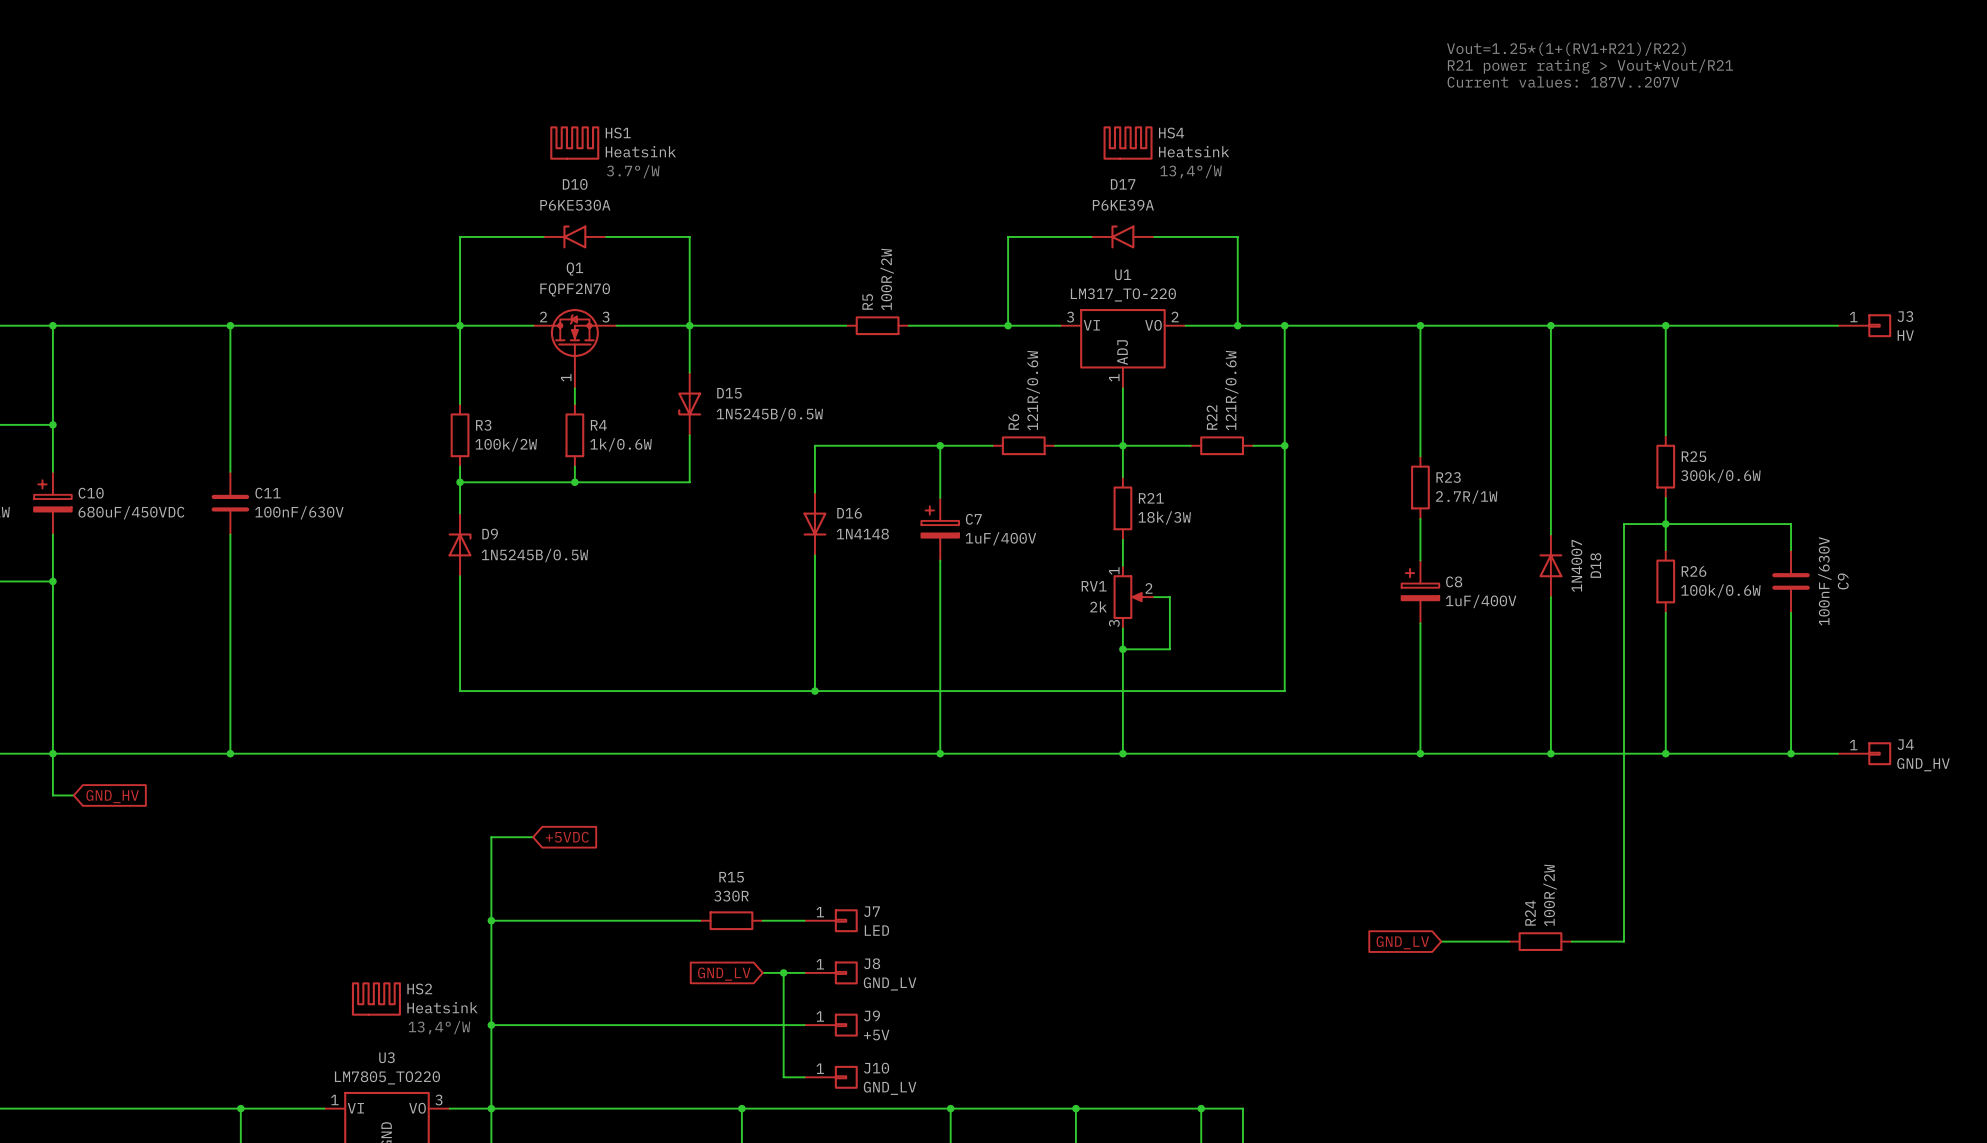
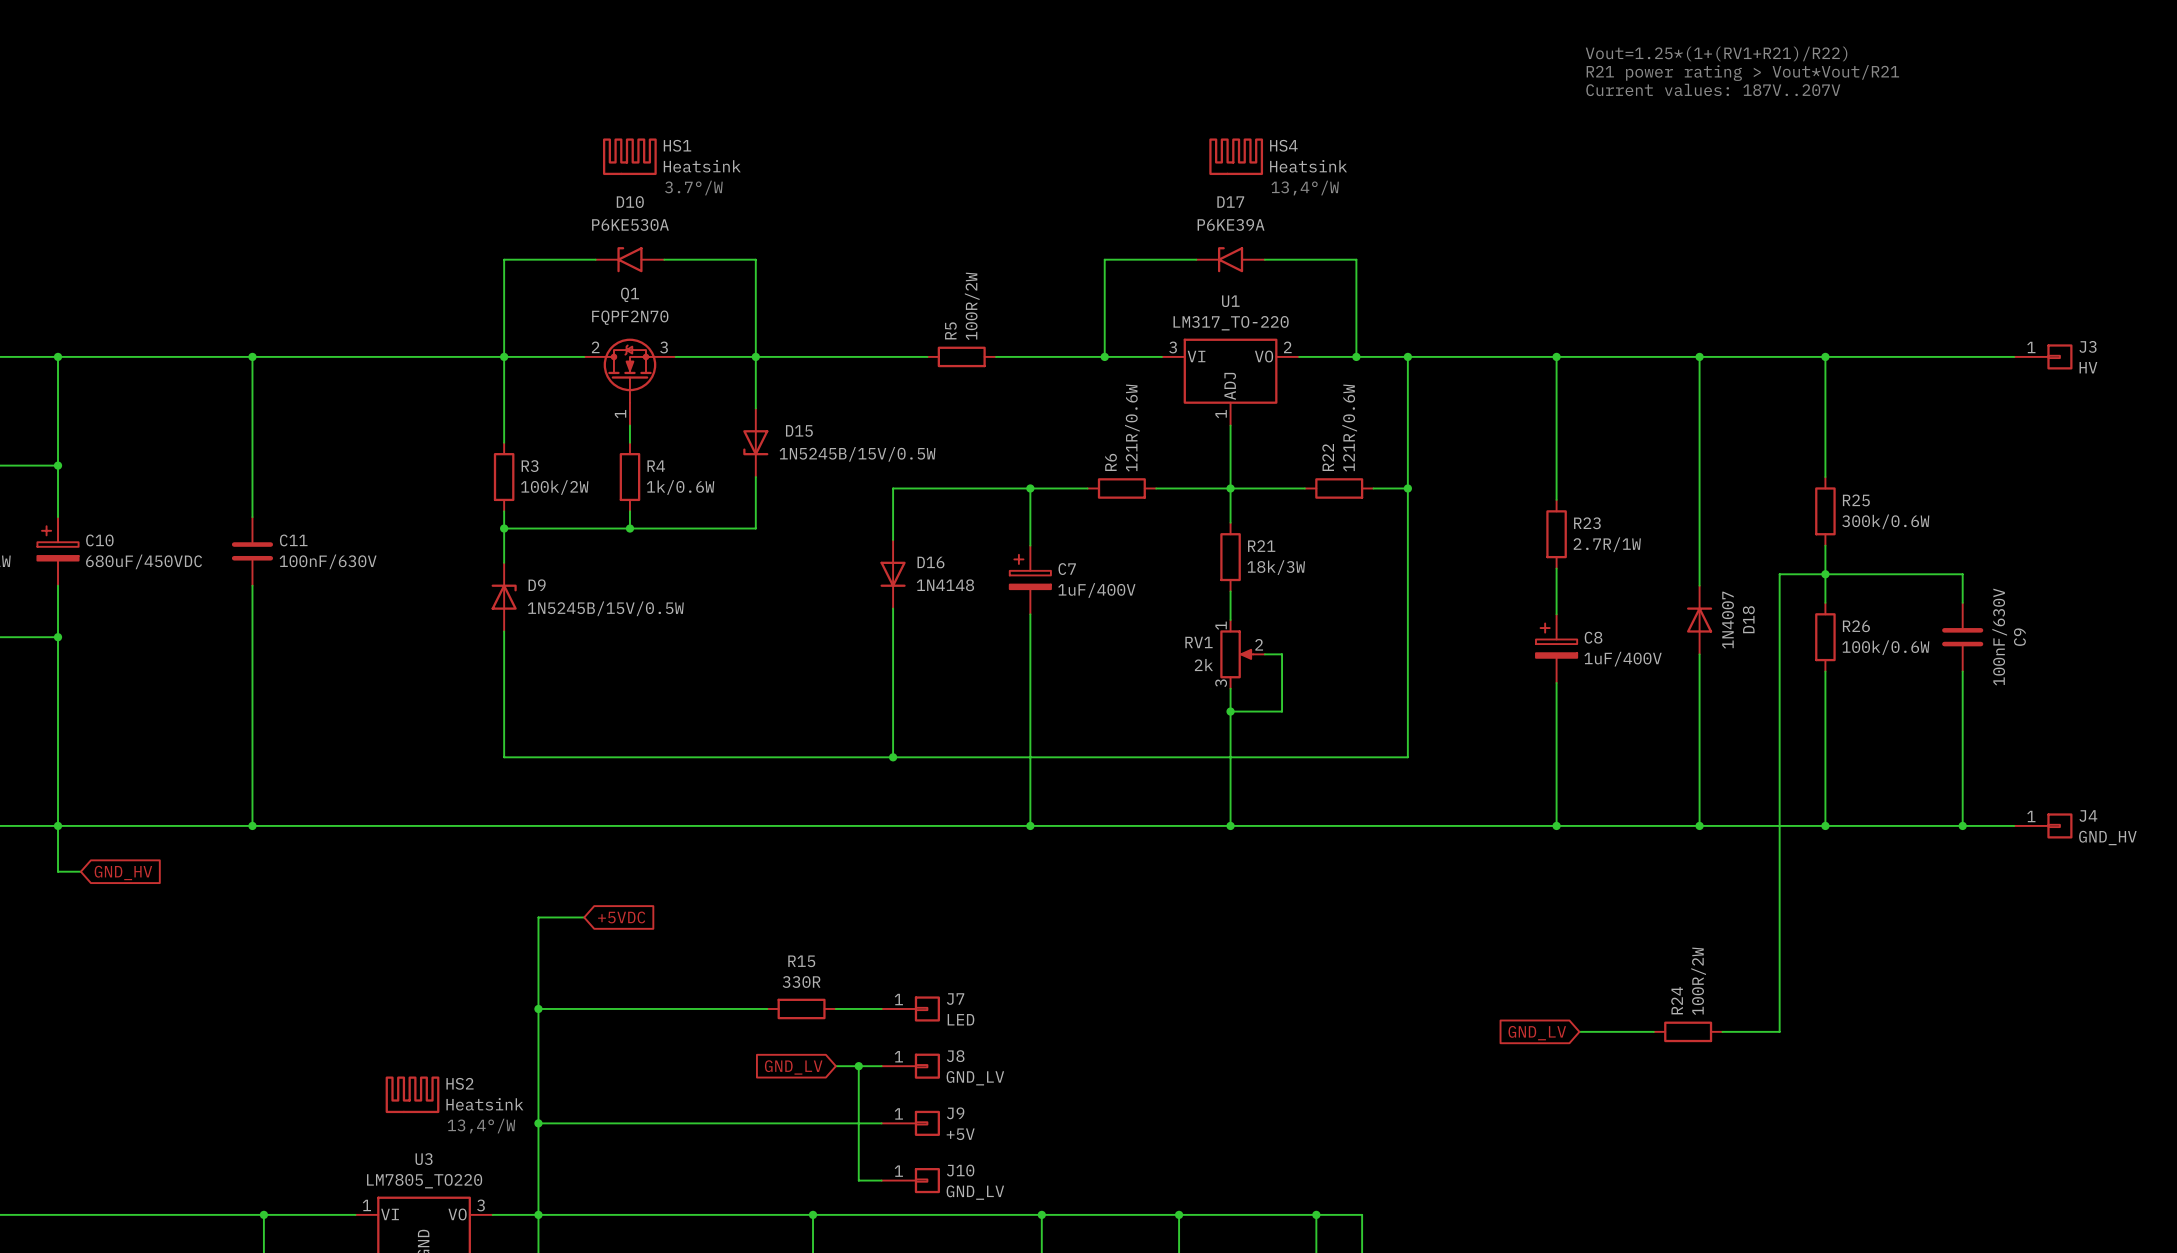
D15 value: 1N5245B/0.5W (769, 414) -> 1N5245B/15V/0.5W (857, 454)
D9 value: 1N5245B/0.5W (534, 555) -> 1N5245B/15V/0.5W (605, 608)

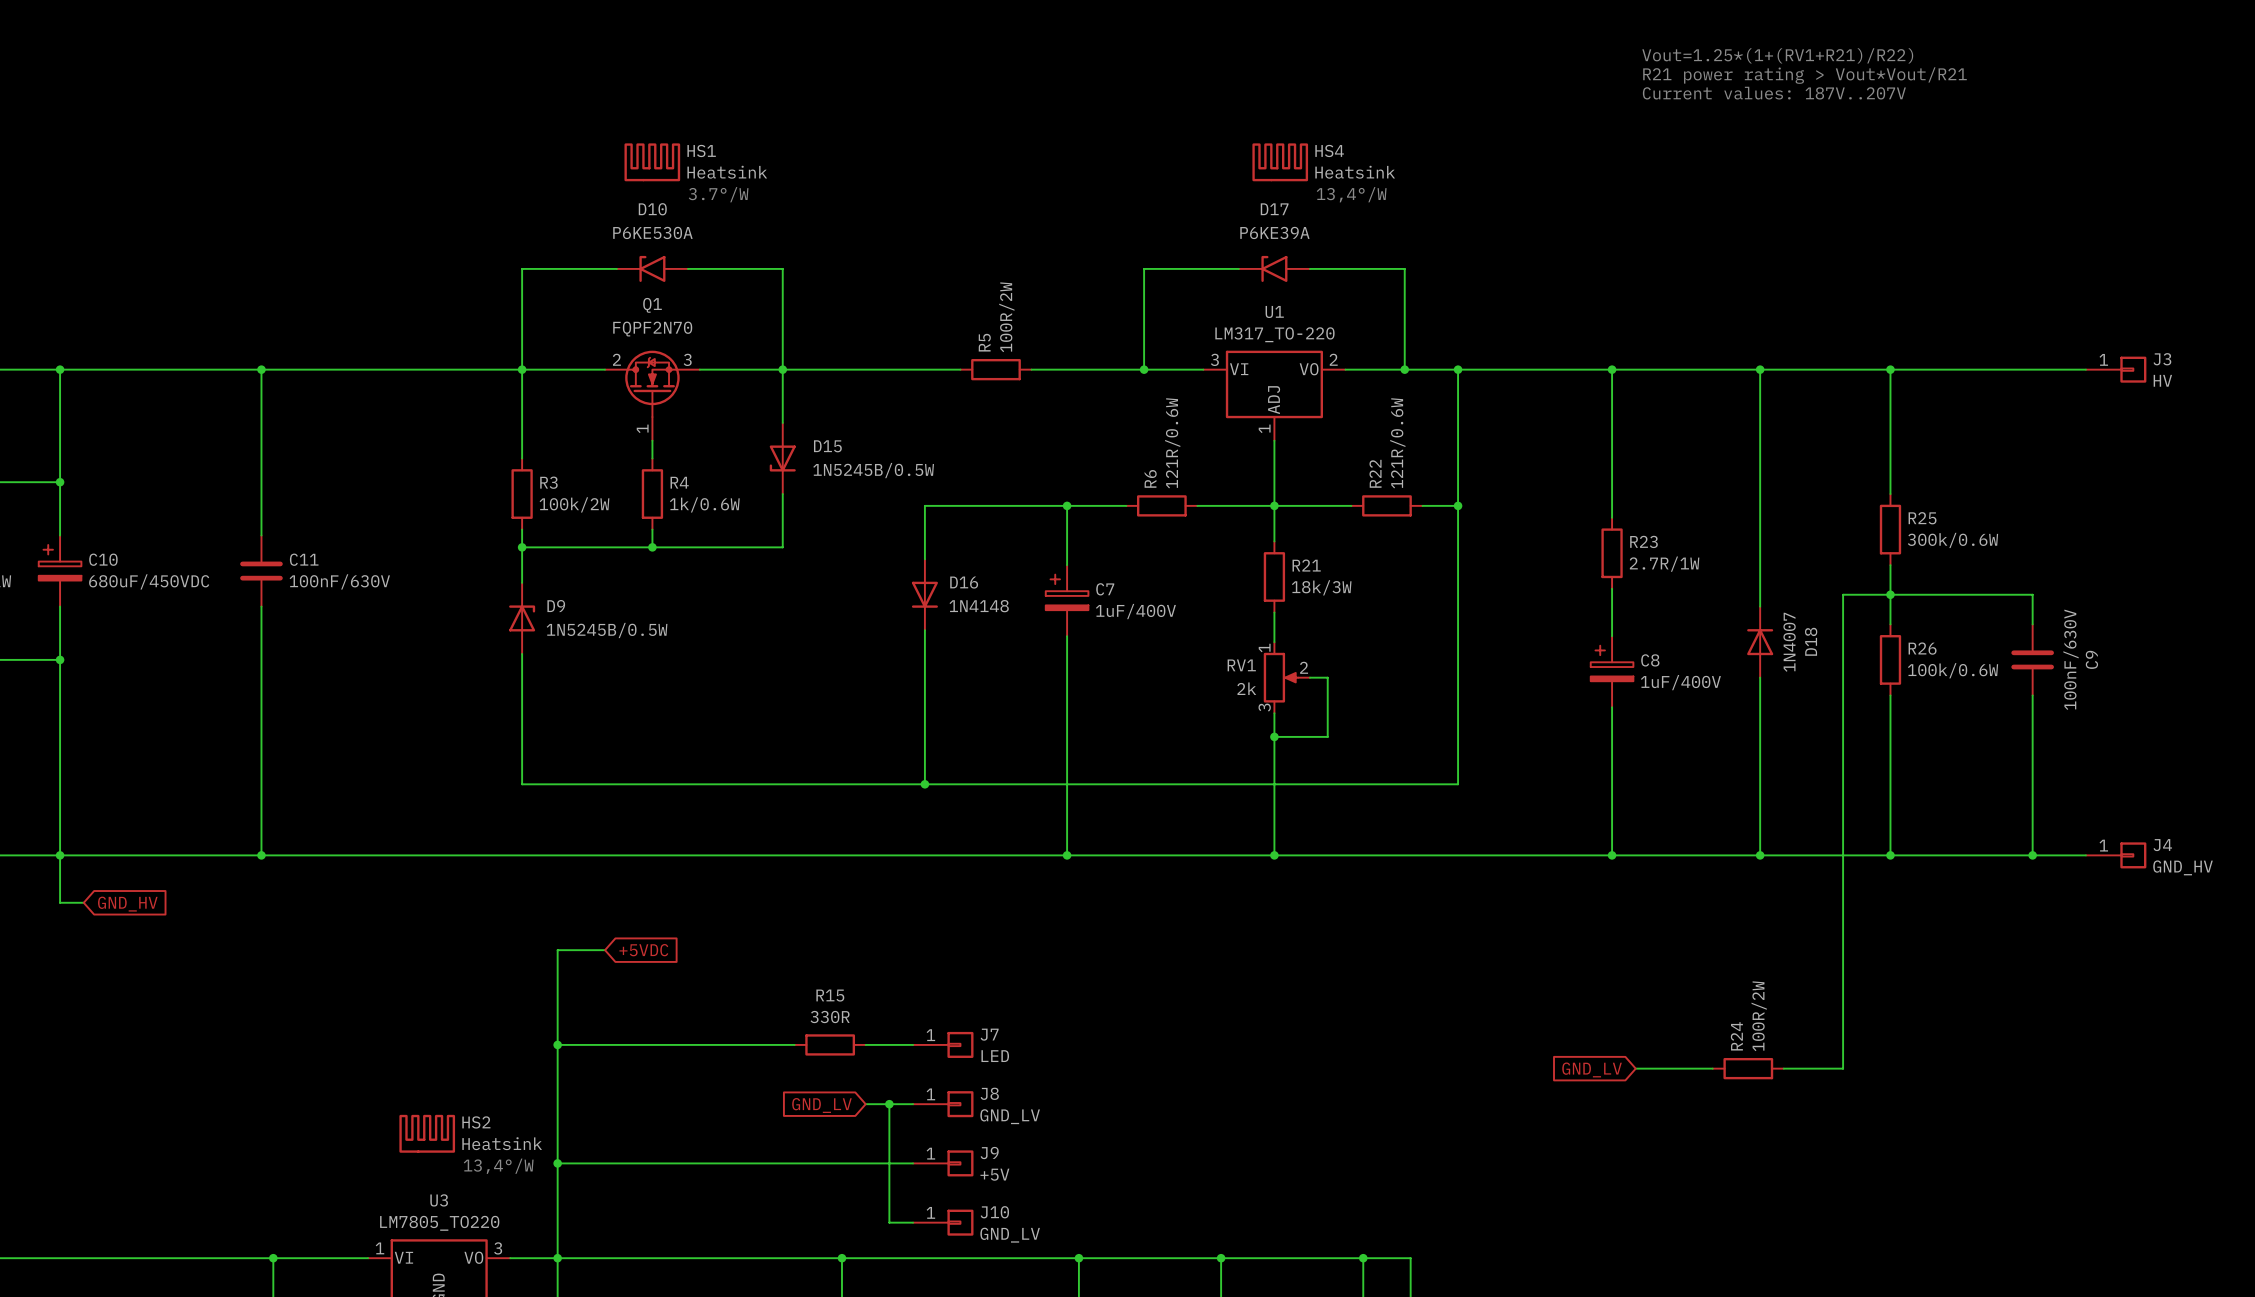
D15 value: 1N5245B/15V/0.5W (857, 454) -> 1N5245B/0.5W (873, 470)
D9 value: 1N5245B/15V/0.5W (605, 608) -> 1N5245B/0.5W (607, 630)

